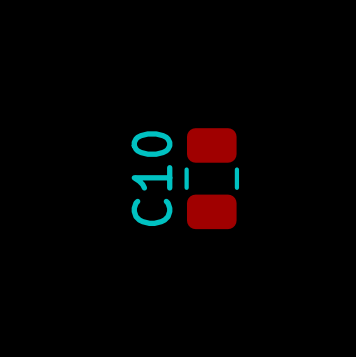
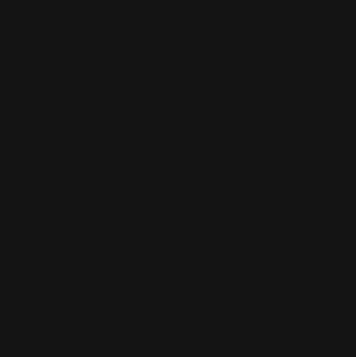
C10: (211, 178) -> none

